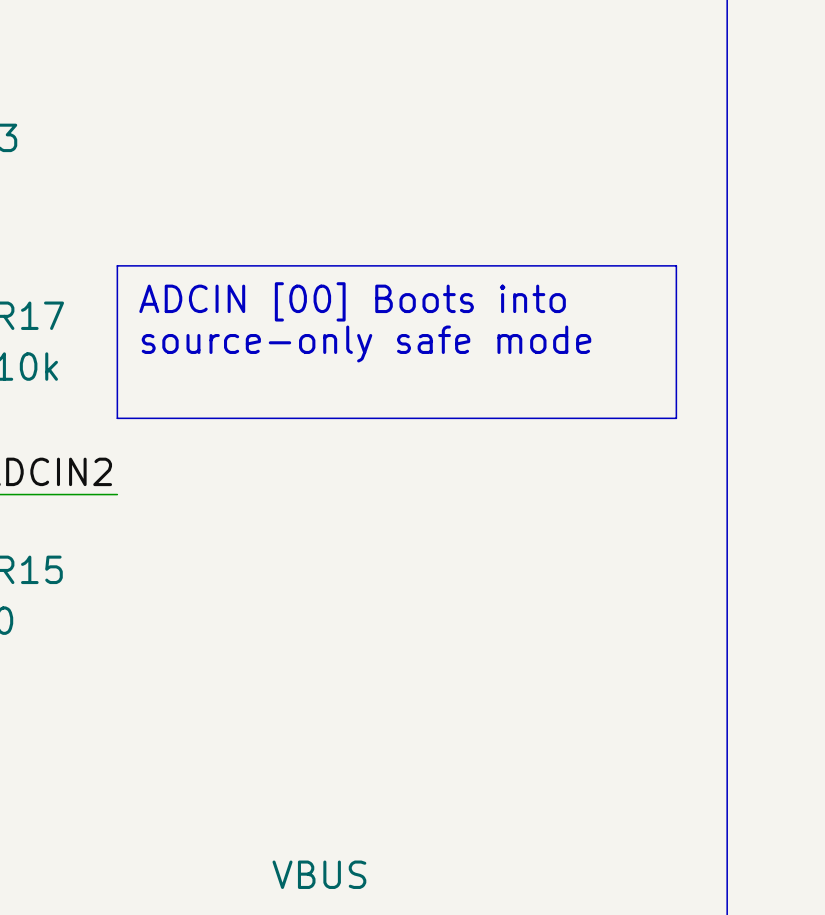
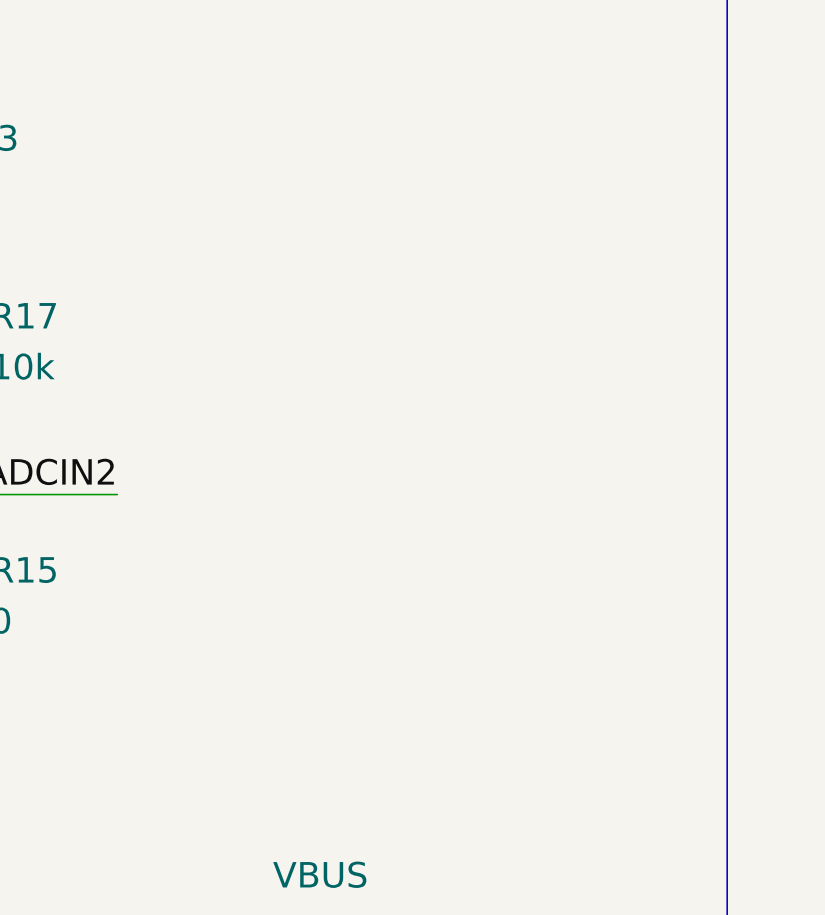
line: (117, 265) (676, 265) (676, 418) (117, 418) (117, 265) -> none
text: ADCIN [00] Boots into (352, 301) -> none
text: source-only safe mode (366, 343) -> none

